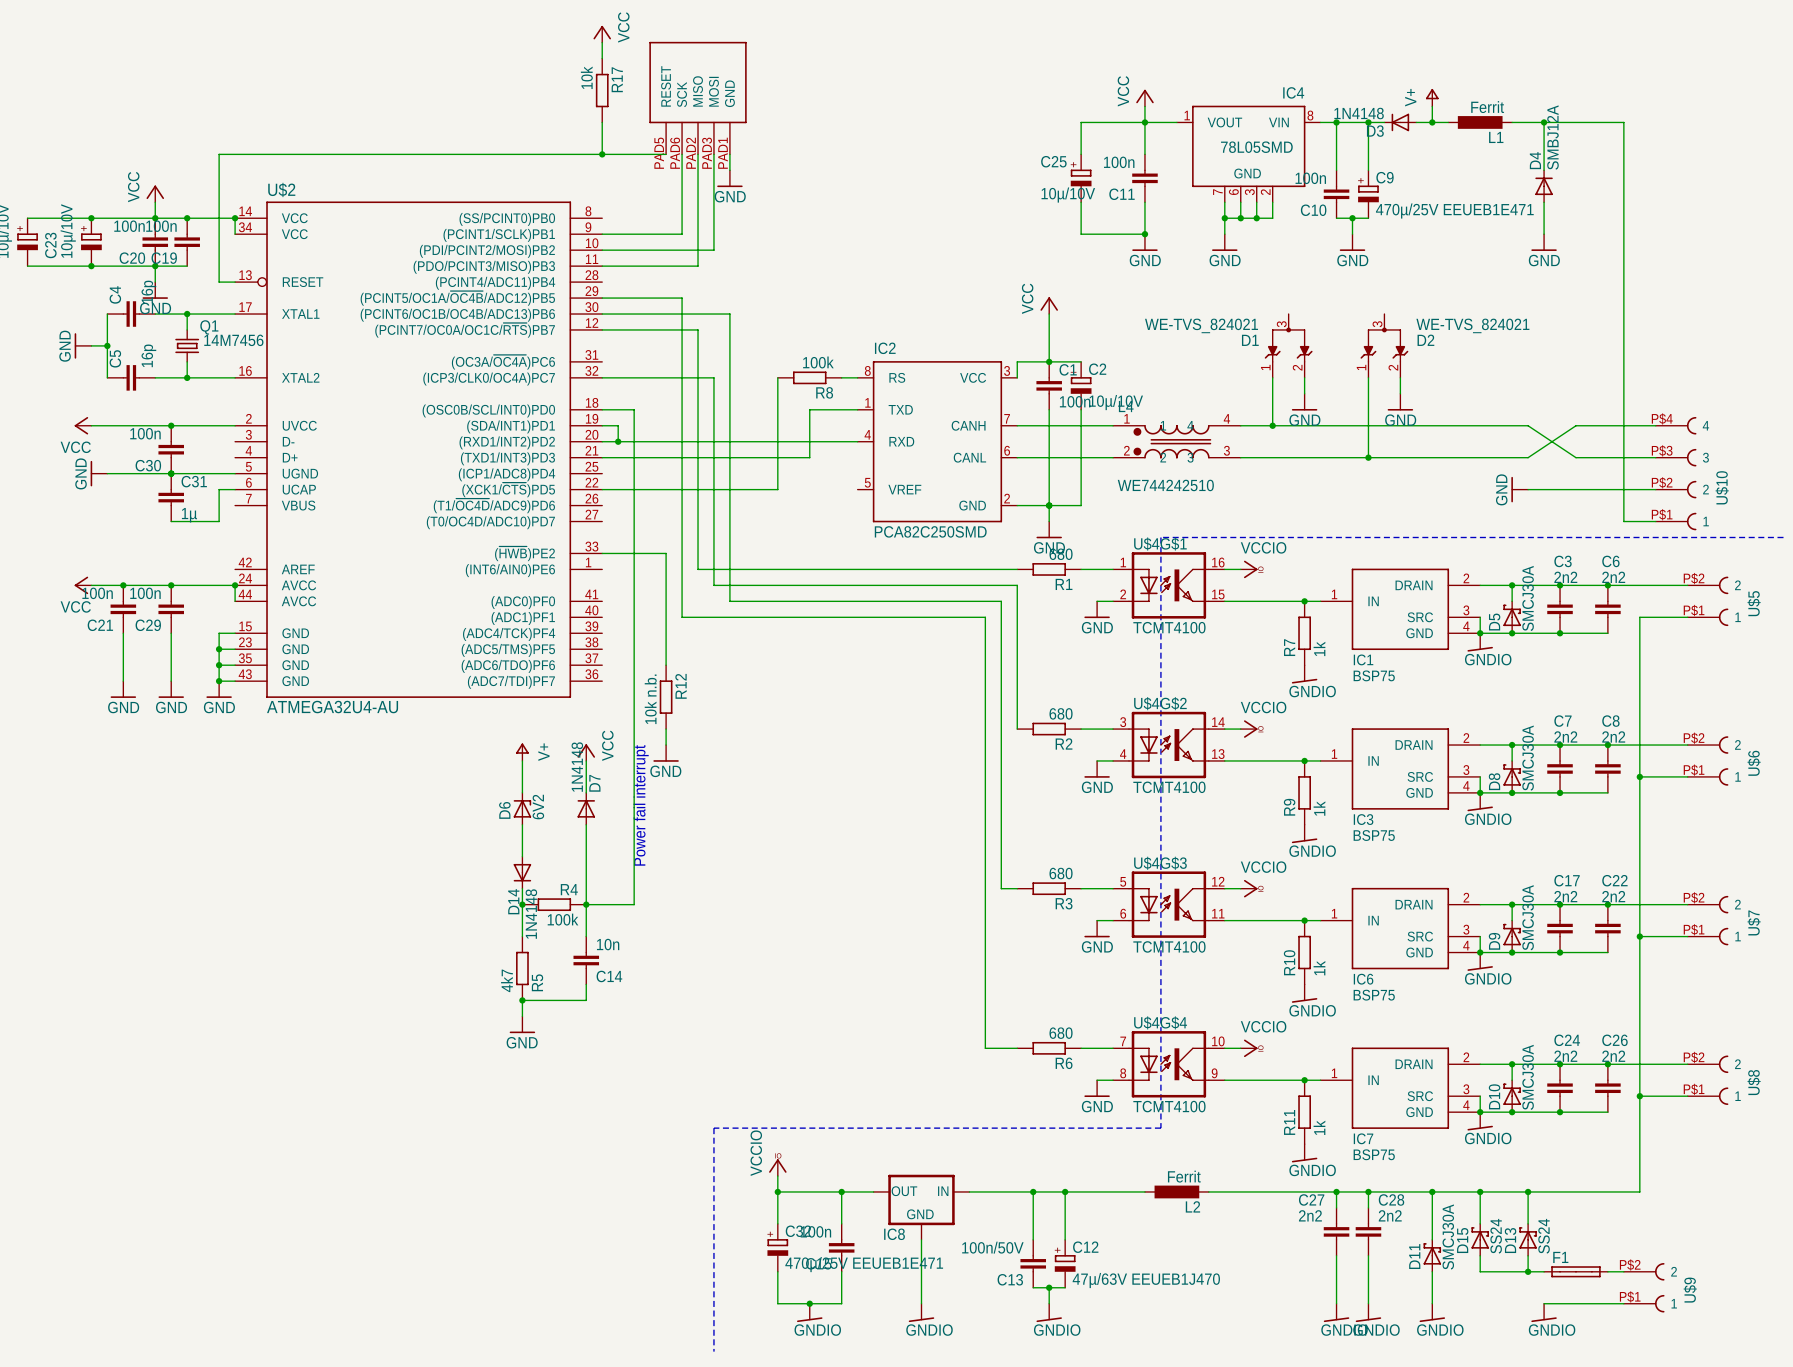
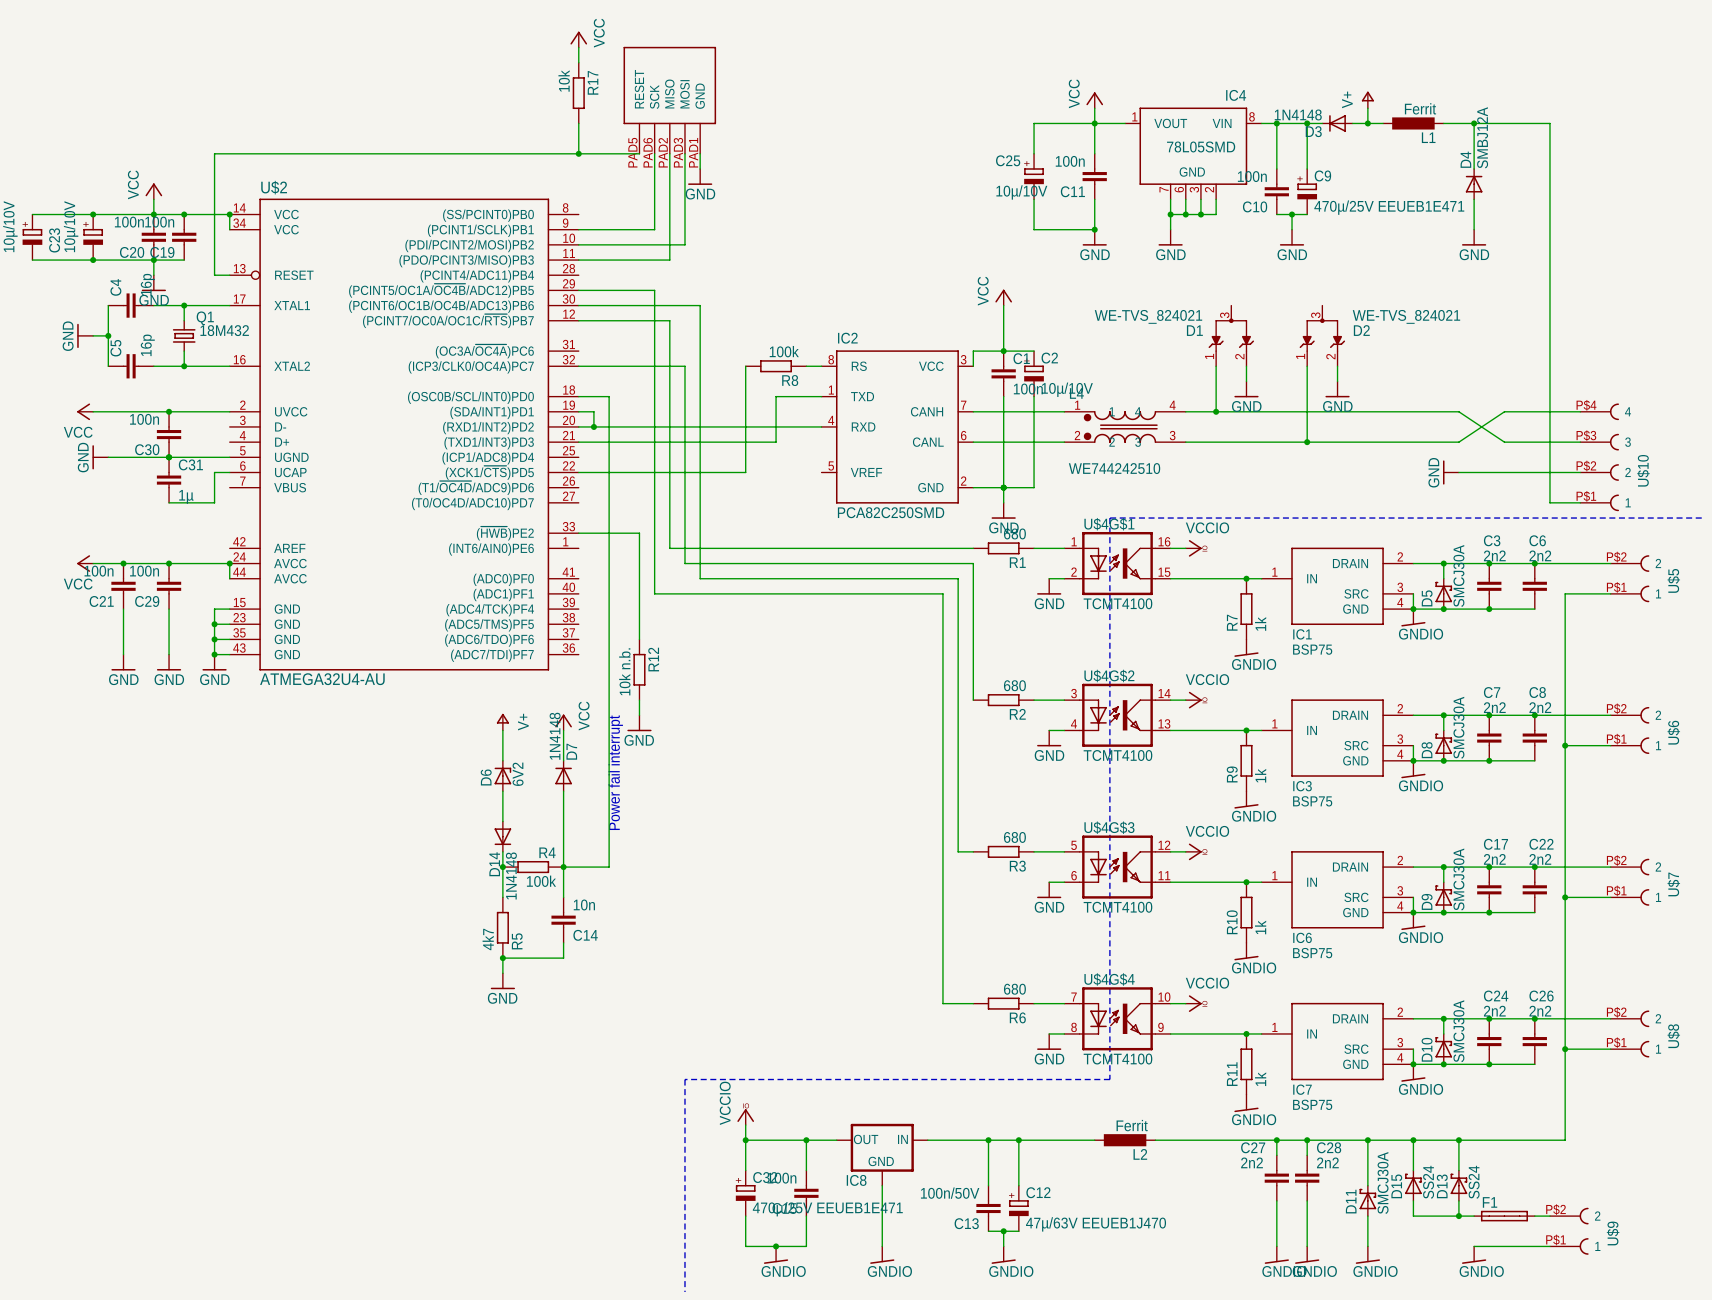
Q1 value: 14M7456 (233, 340) -> 18M432 (224, 330)

